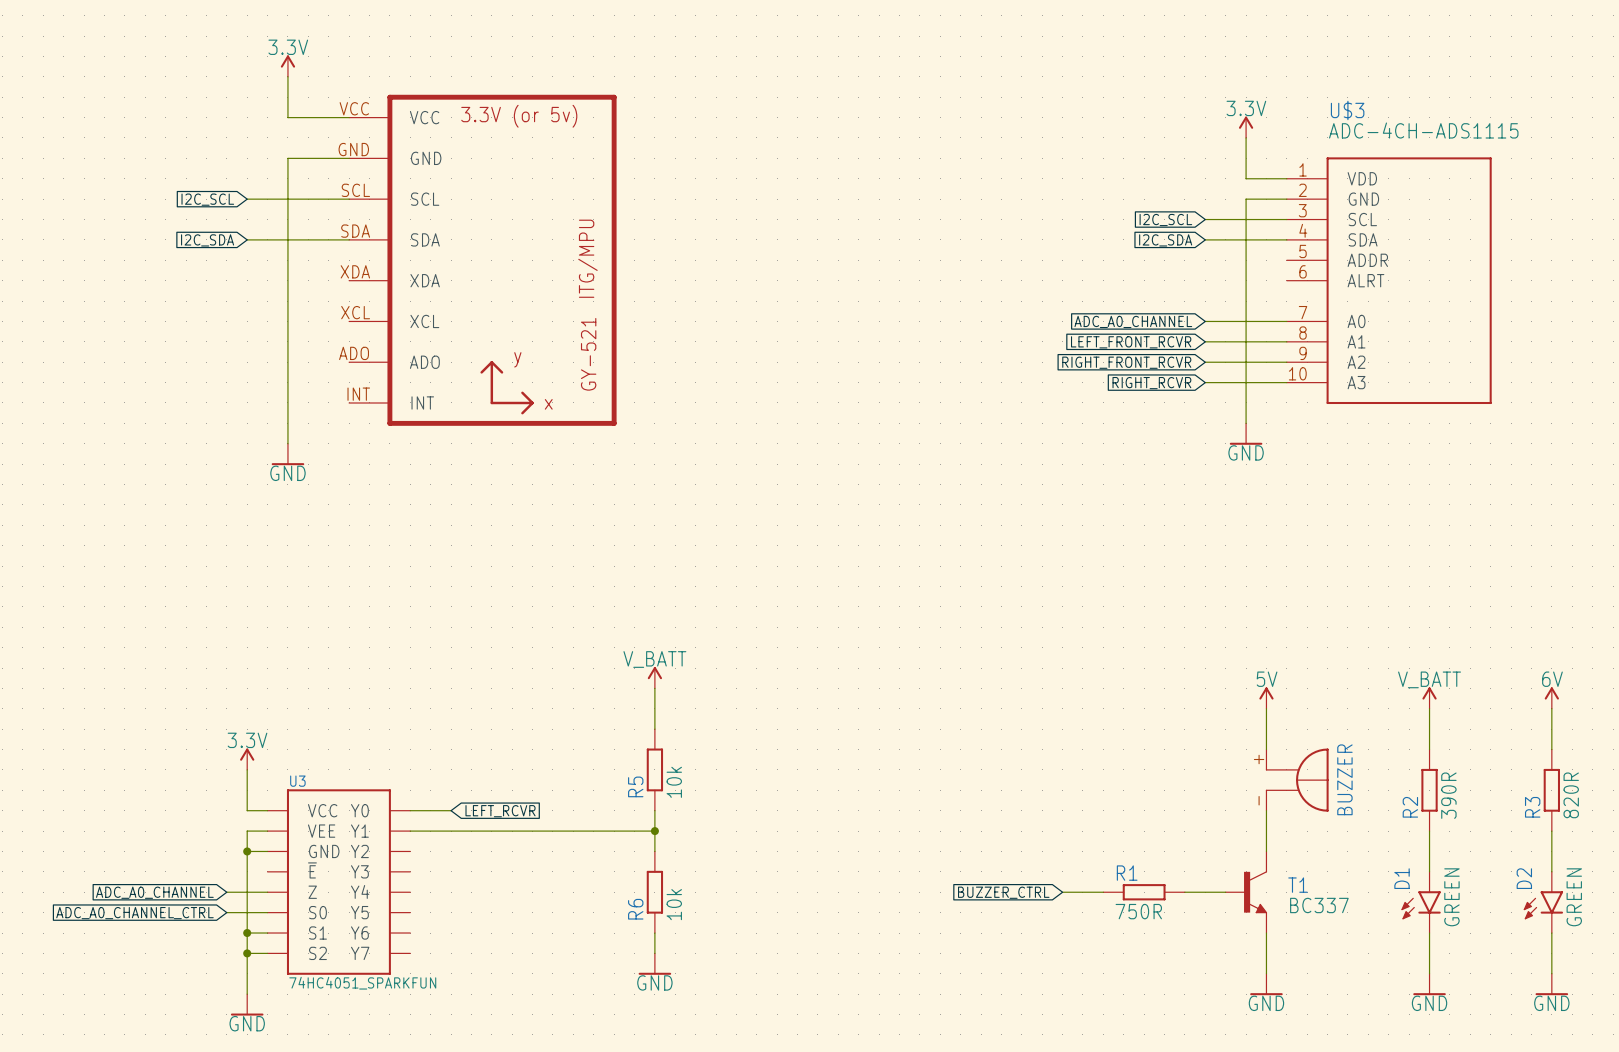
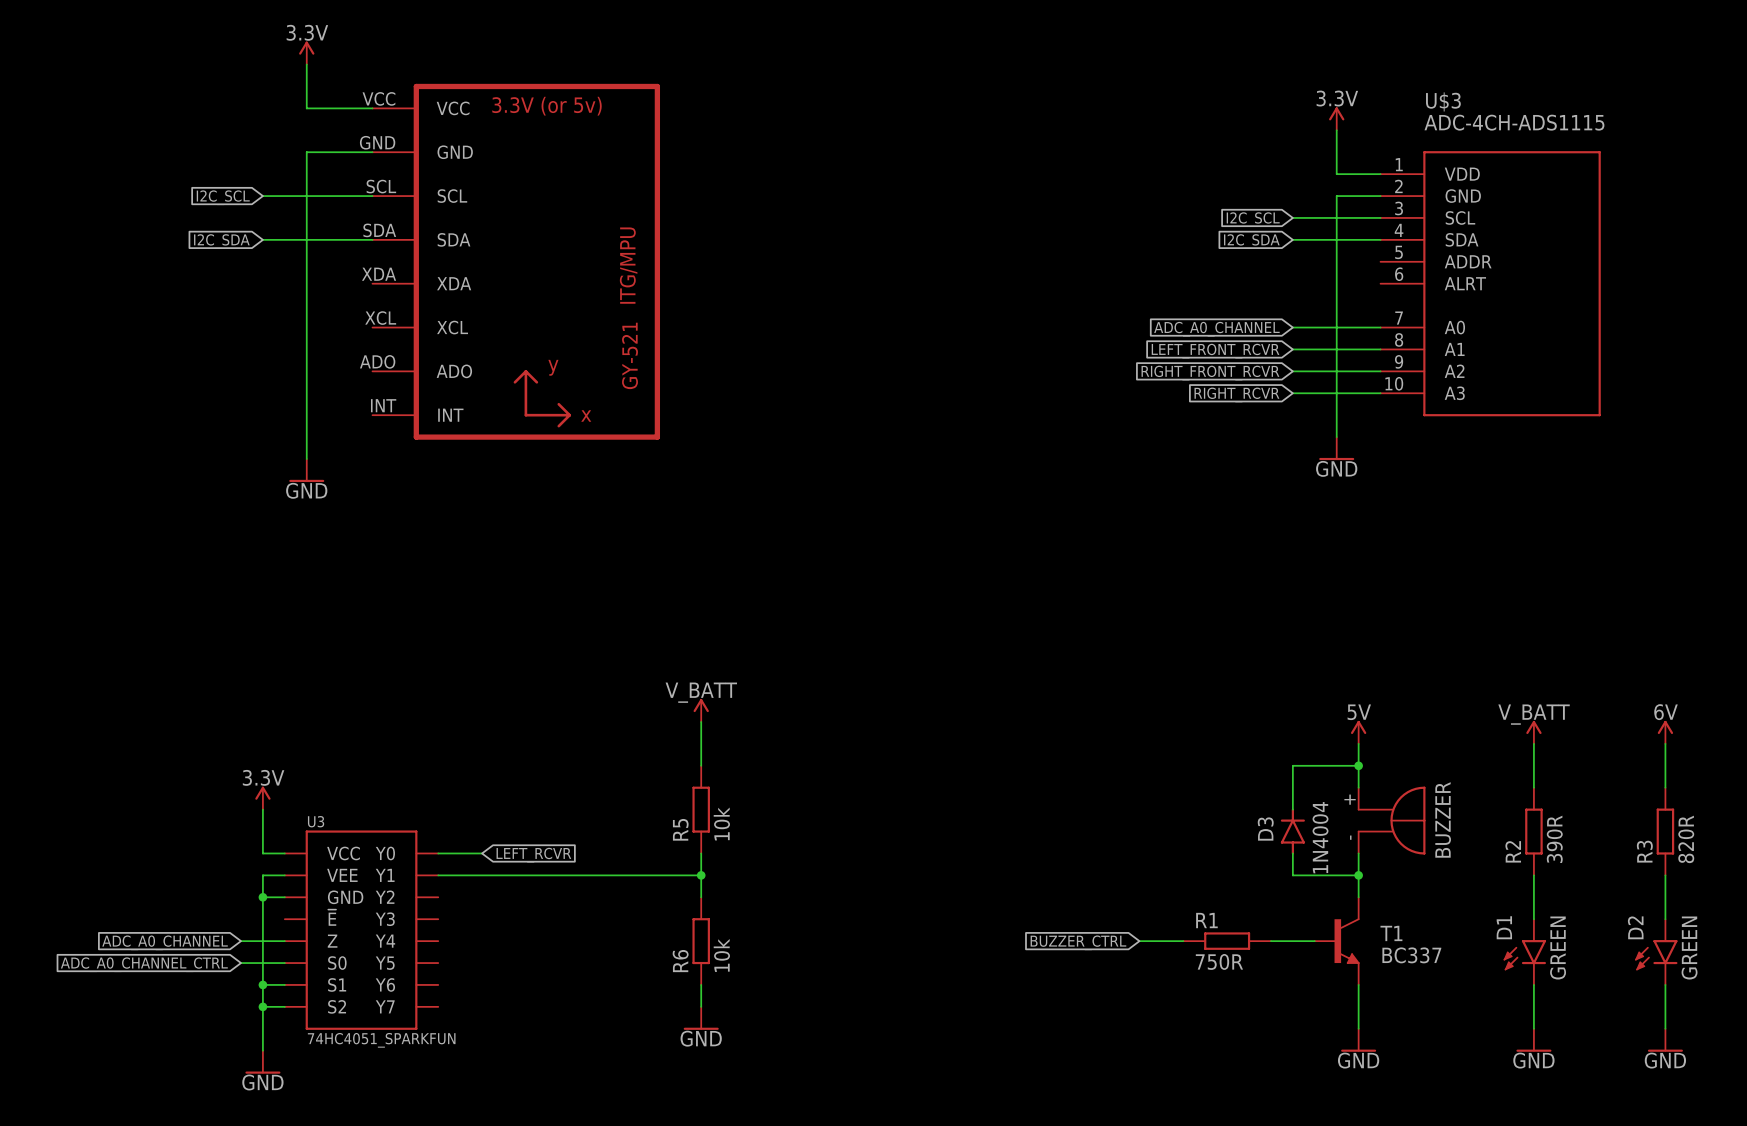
wire: none -> (1358, 765) (1292, 765) (1292, 809)
junction: none -> (1358, 765)
D3: none -> 1N4004 (1292, 831)
wire: none -> (1292, 853) (1292, 875) (1358, 875)
junction: none -> (1358, 875)

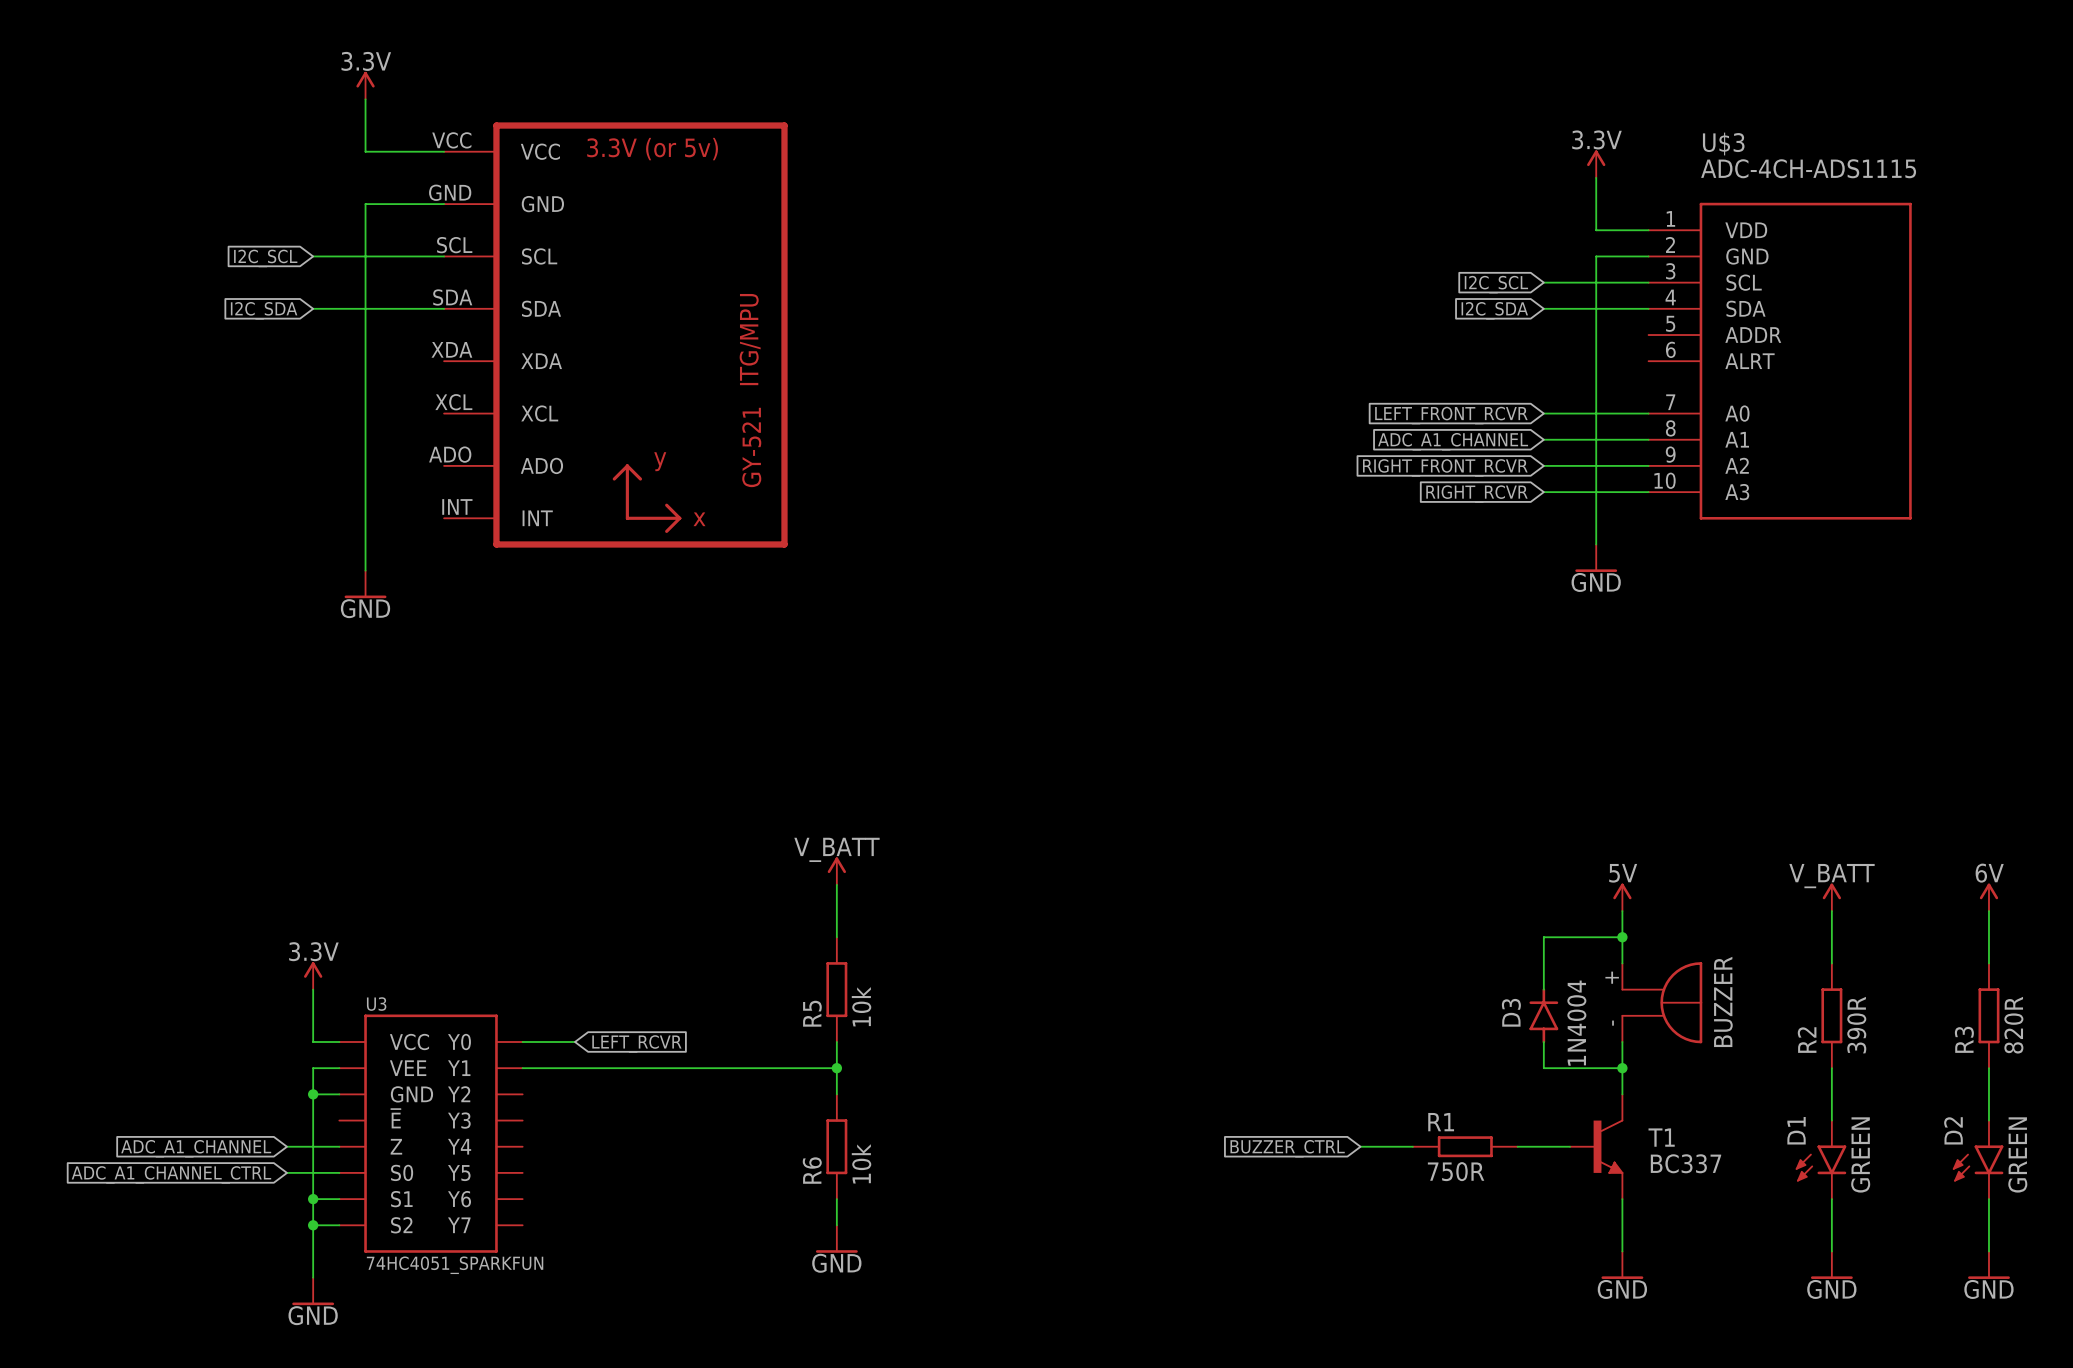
global label: ADC_A0_CHANNEL (1216, 329) -> LEFT_FRONT_RCVR (1451, 415)
global label: LEFT_FRONT_RCVR (1215, 351) -> ADC_A1_CHANNEL (1453, 441)
global label: ADC_A0_CHANNEL (165, 942) -> ADC_A1_CHANNEL (196, 1148)
global label: ADC_A0_CHANNEL_CTRL (144, 964) -> ADC_A1_CHANNEL_CTRL (171, 1174)

